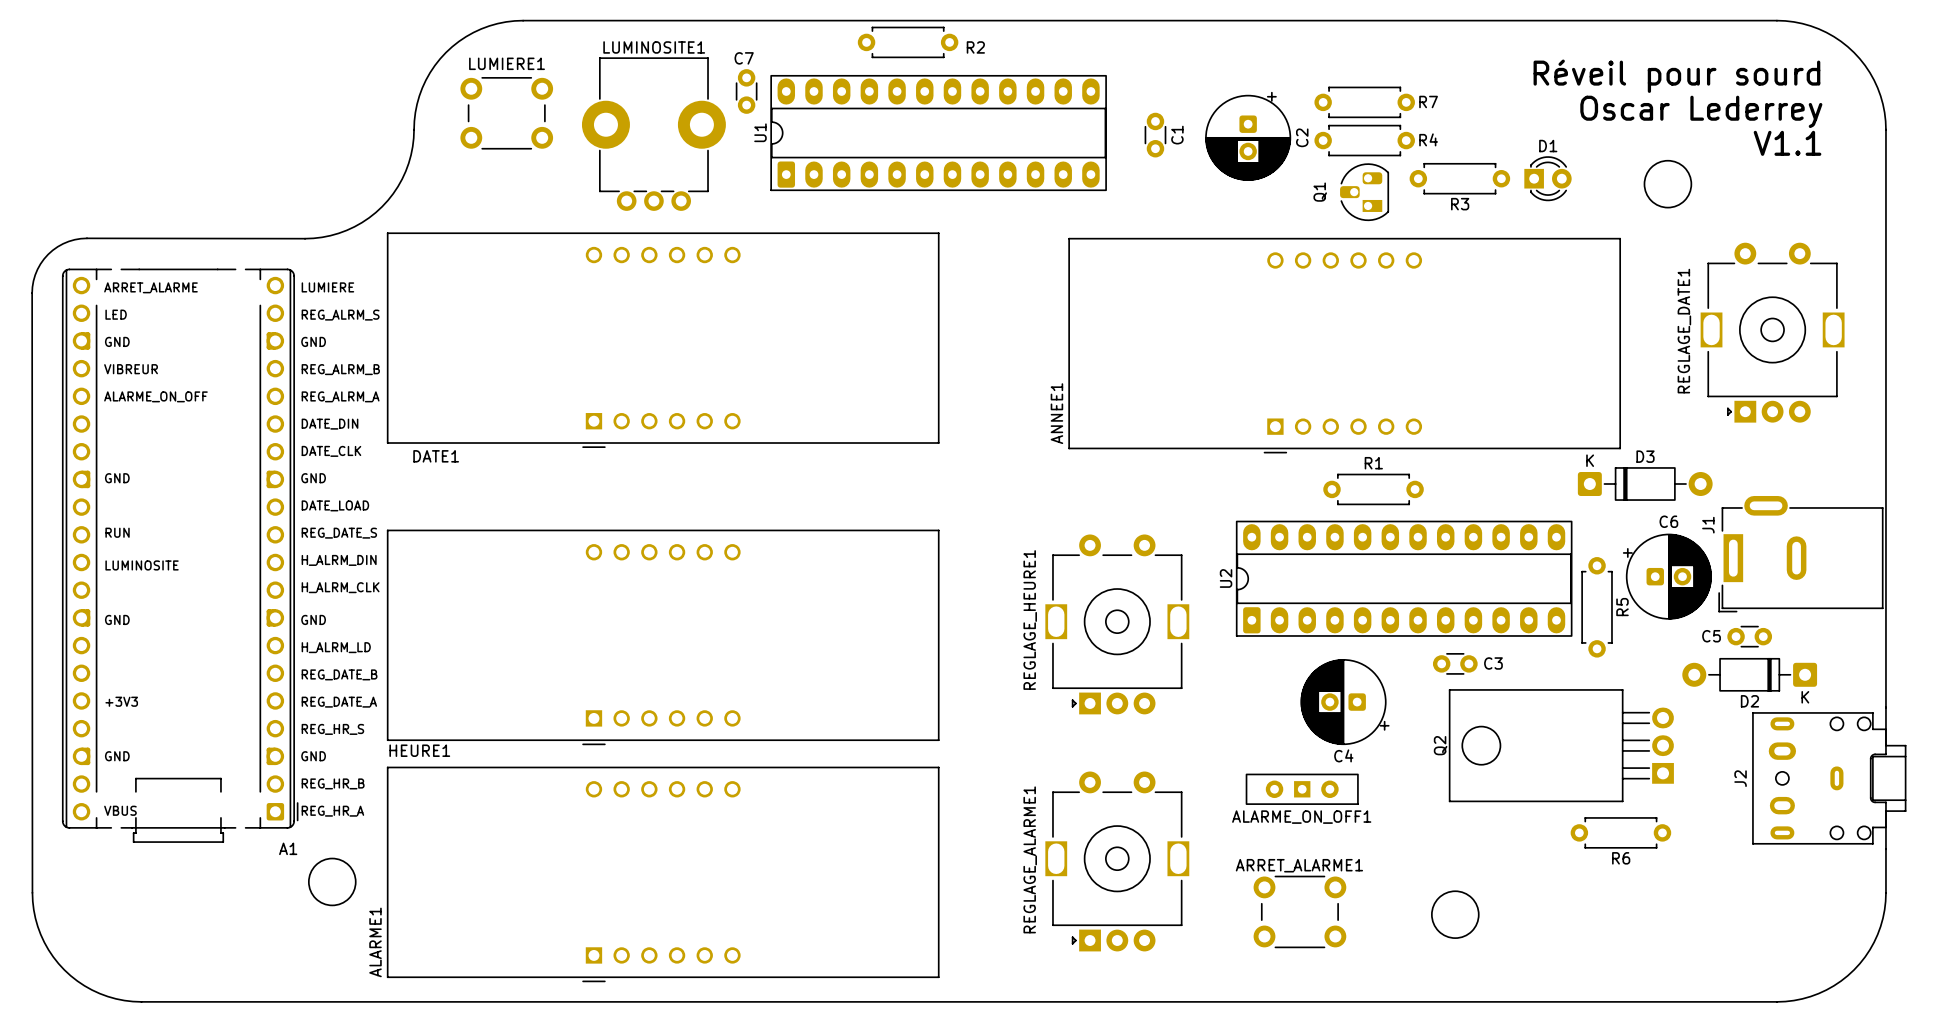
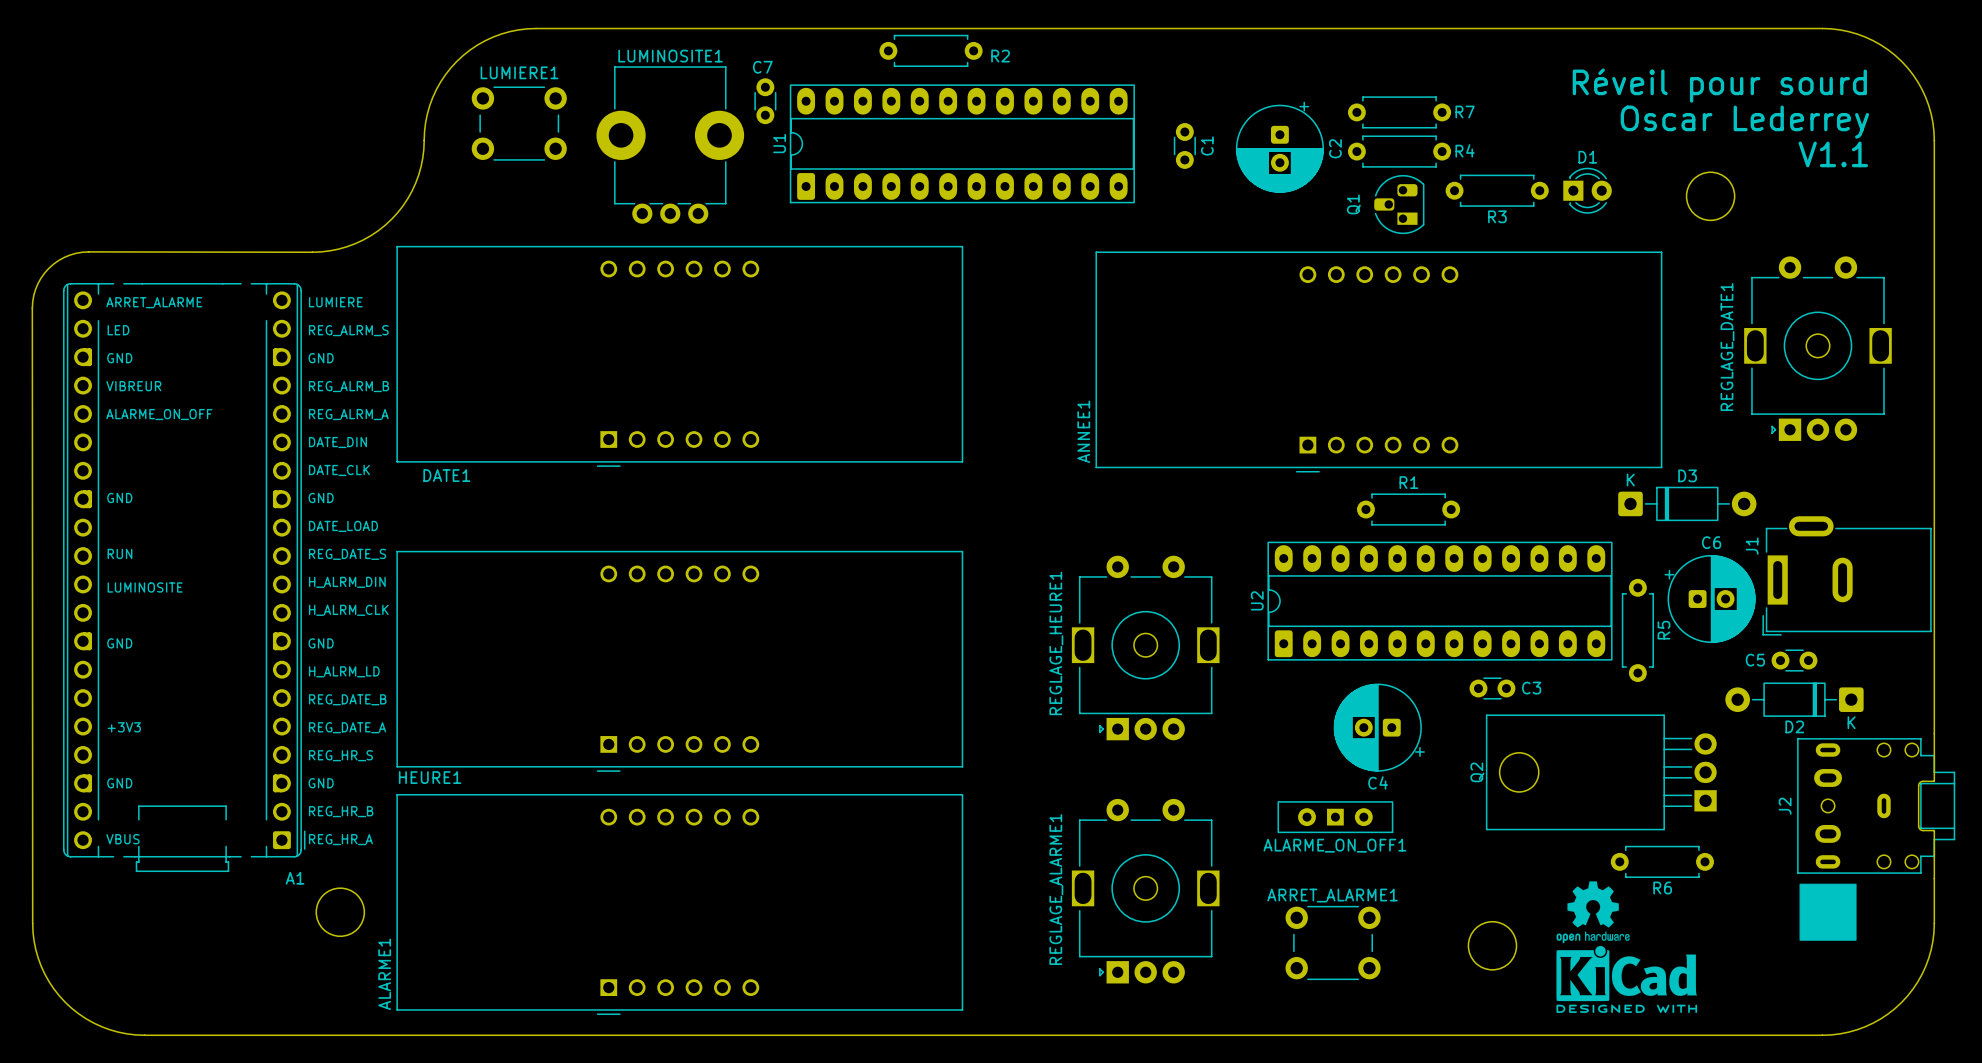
drawing: none -> [1556, 881, 1698, 1013]
drawing: none -> [1799, 883, 1857, 941]

